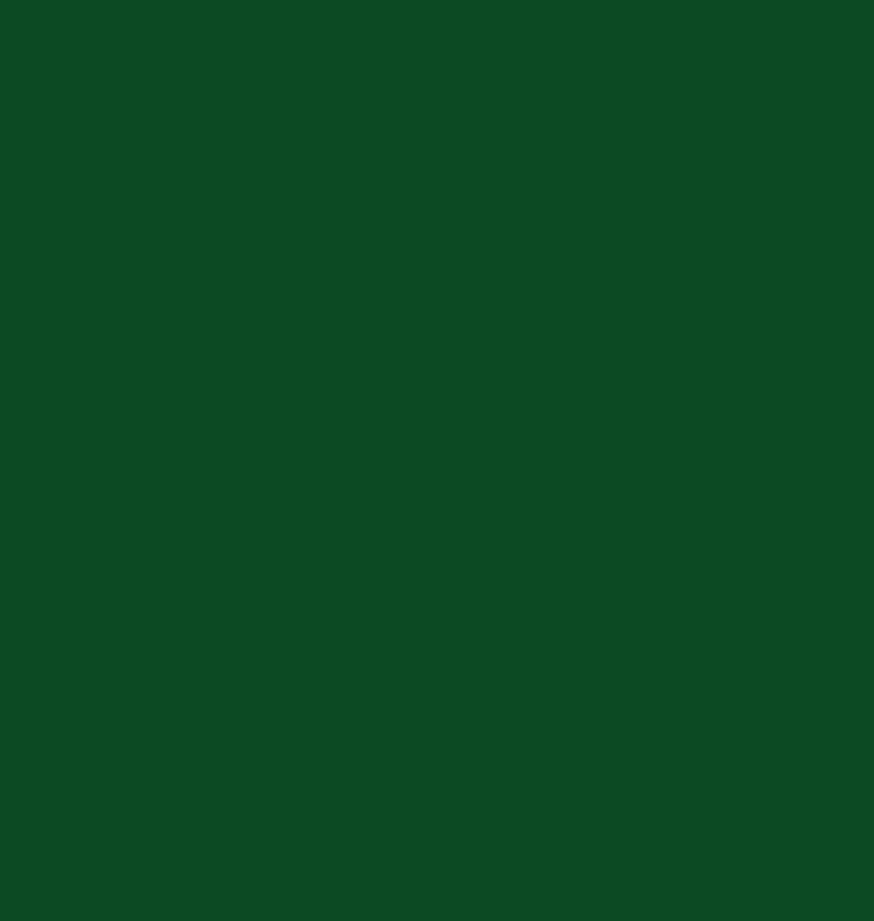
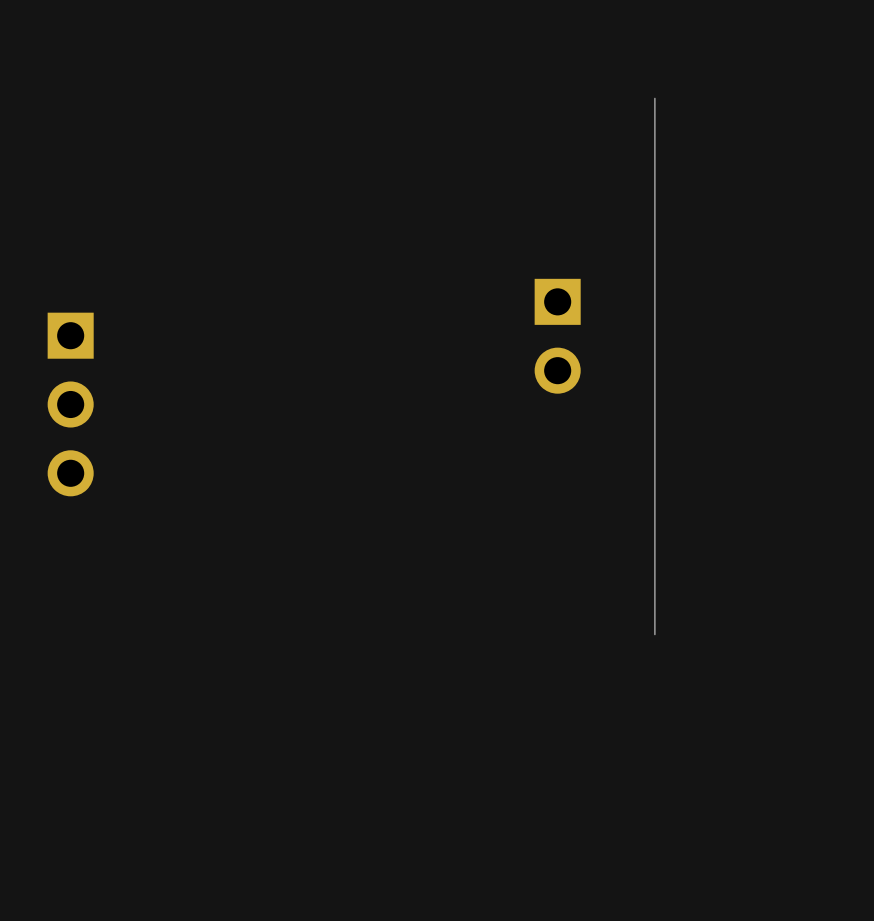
board edge: none -> (654, 98) (654, 634)
part: none -> (557, 336)
part: none -> (70, 404)

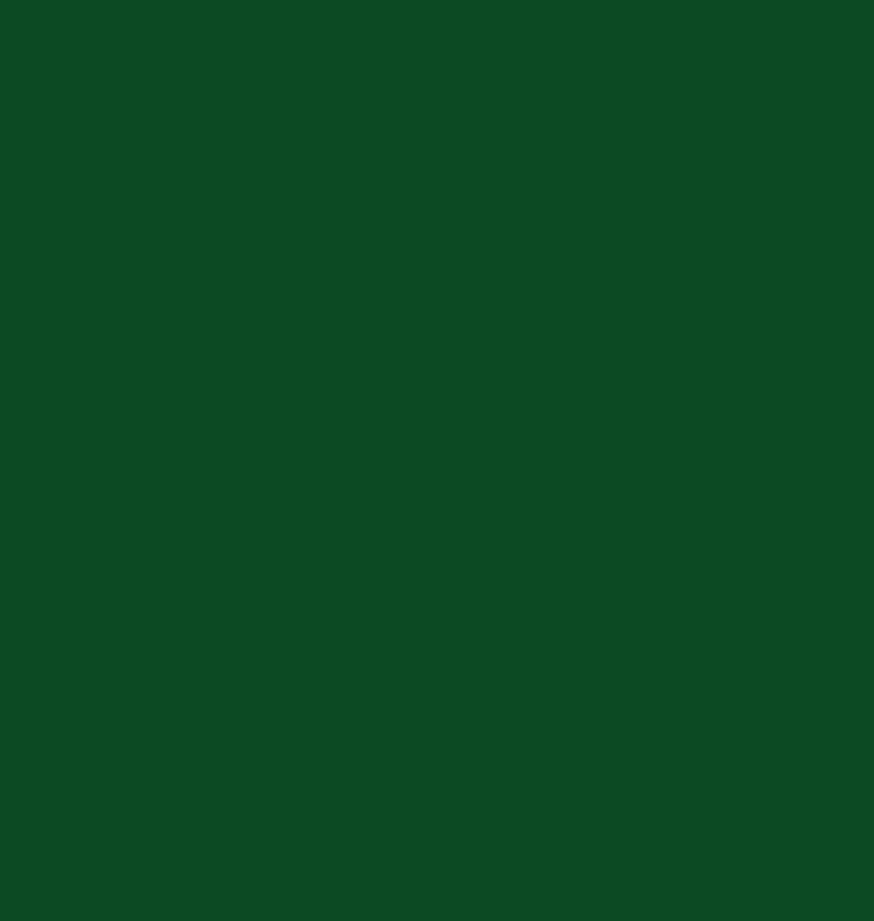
board edge: (654, 98) (654, 634) -> none
part: (557, 336) -> none
part: (70, 404) -> none

